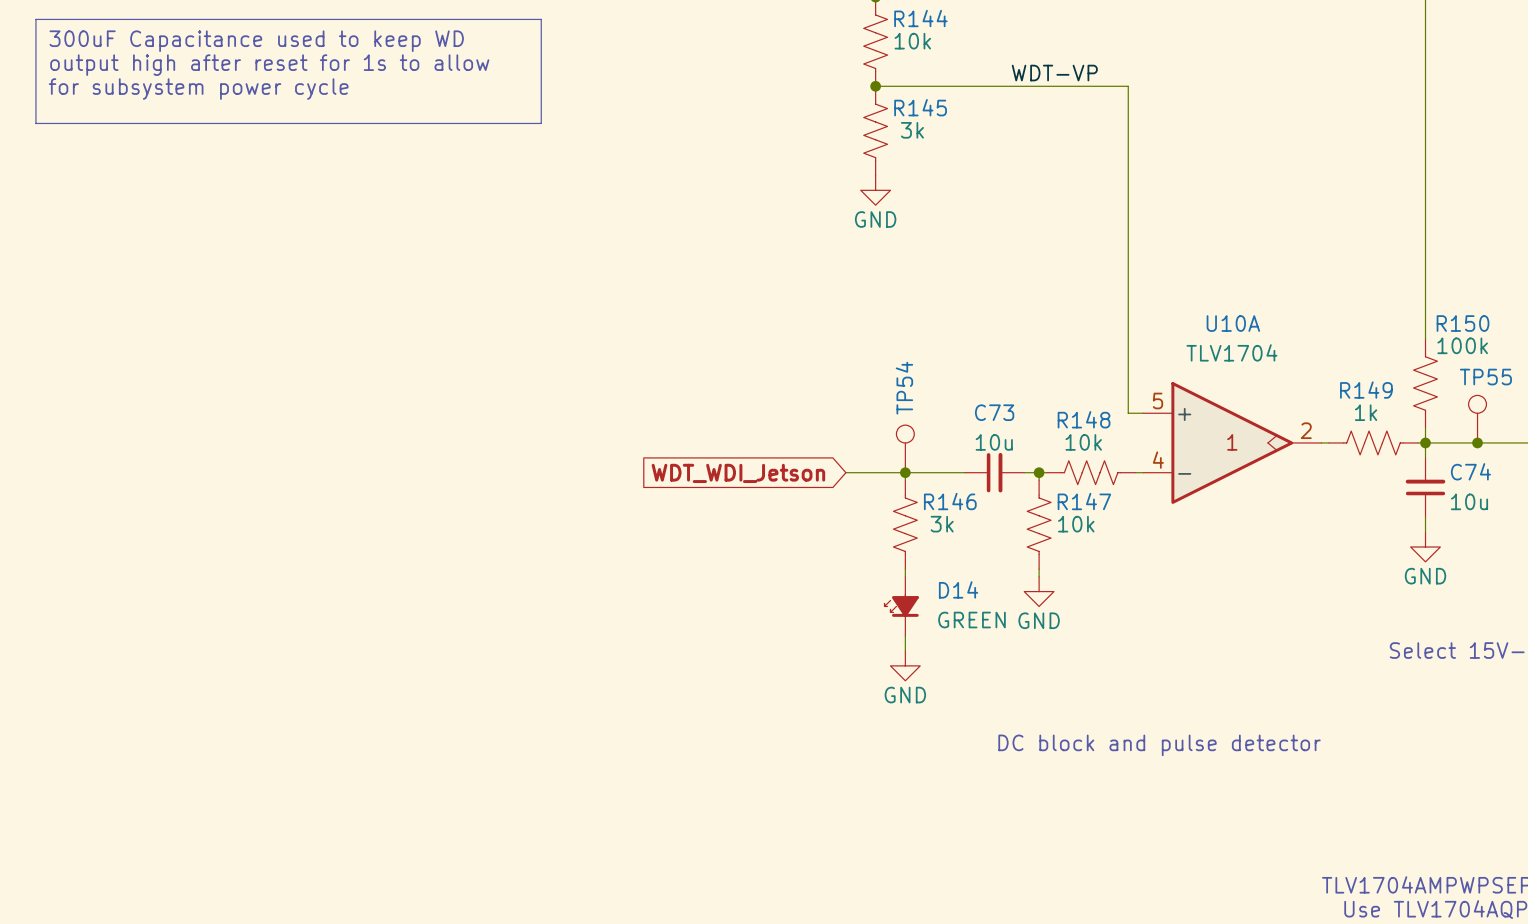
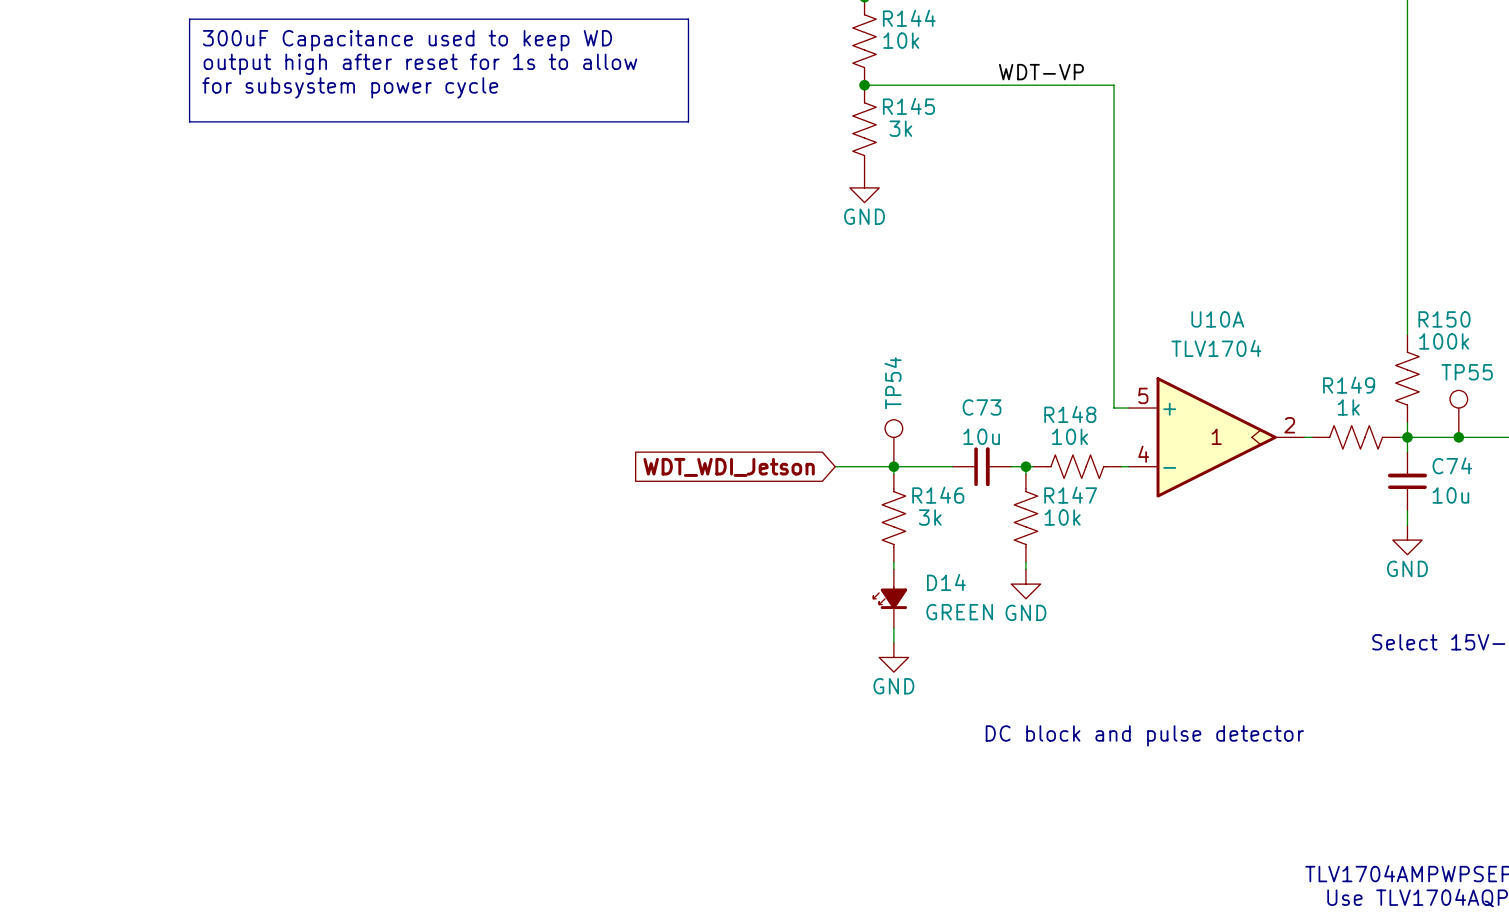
line: (192, 19) (35, 19) (35, 123) (192, 123) -> (189, 19) (189, 121)
line: (541, 19) (541, 123) -> (534, 19) (688, 19) (688, 121) (534, 121)
text position: 300uF Capacitance used to keep WD (256, 41) -> 300uF Capacitance used to keep WD (407, 40)
text position: output high after reset for 1s to allow (269, 65) -> output high after reset for 1s to allow (420, 64)
text position: for subsystem power cycle (198, 89) -> for subsystem power cycle (350, 87)

